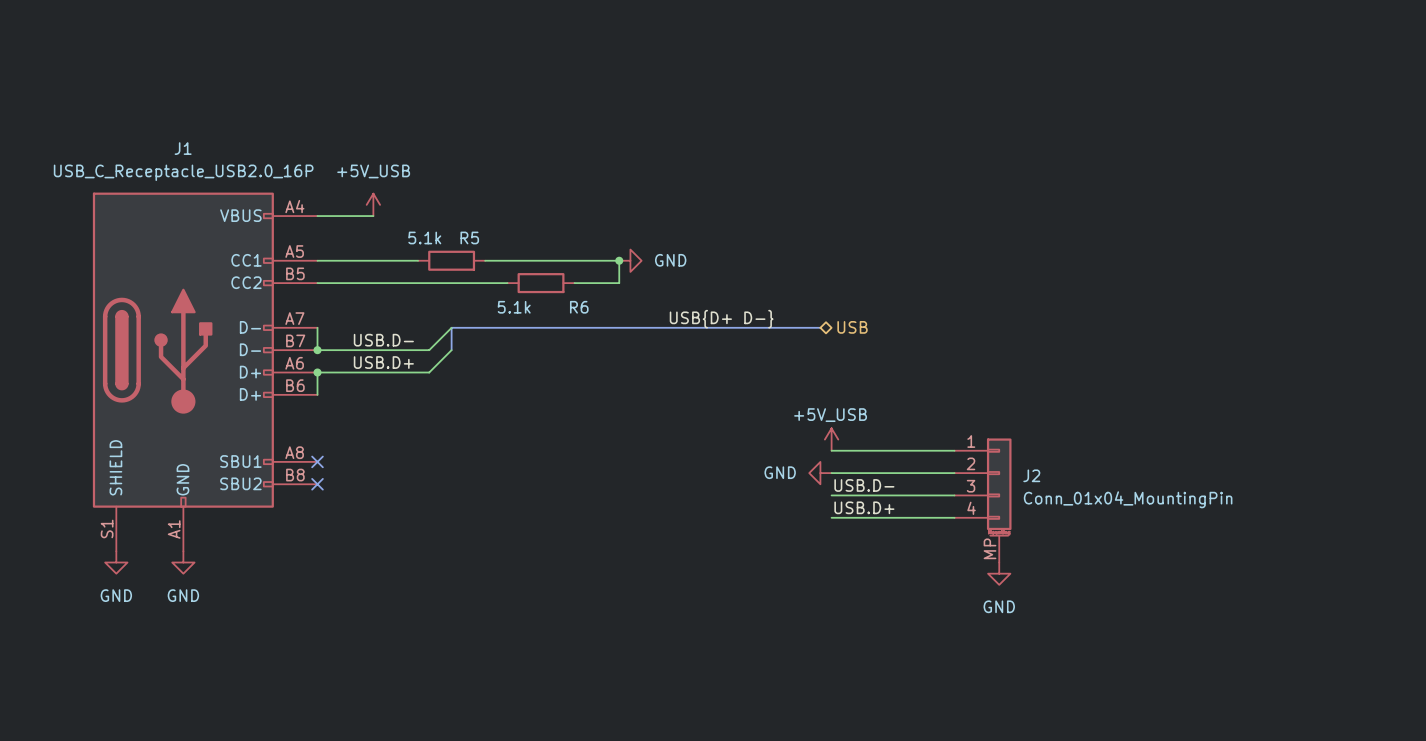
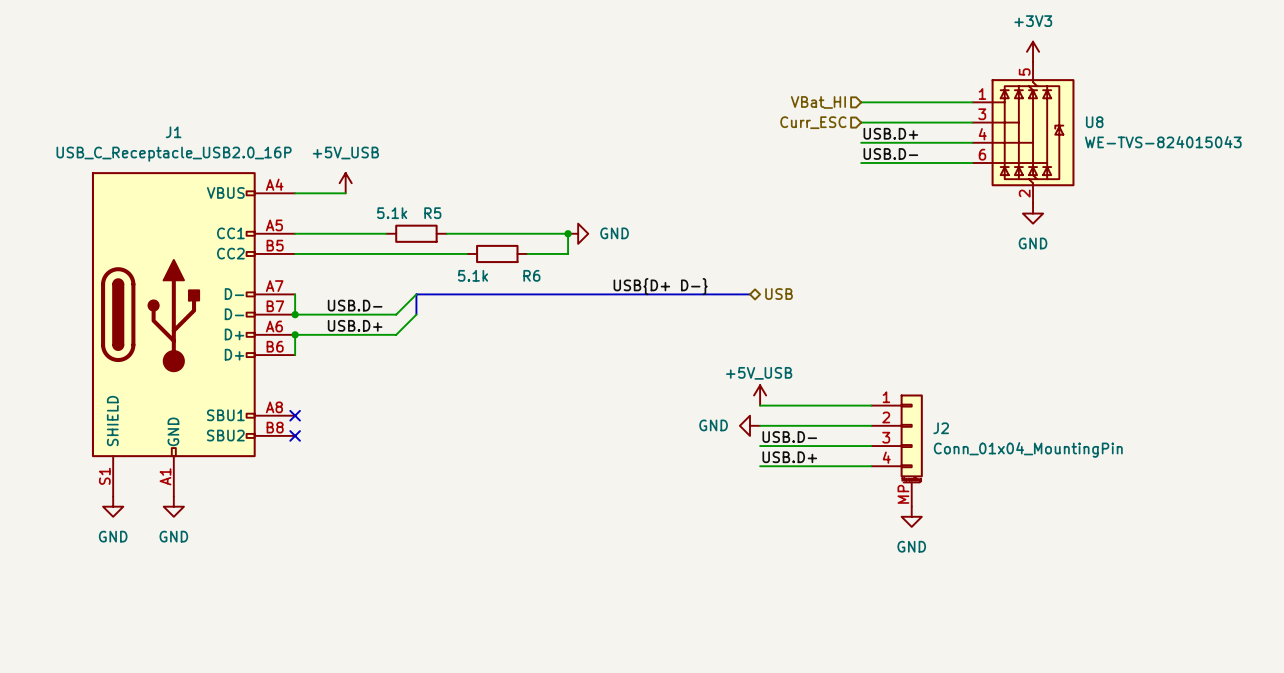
power symbol: none -> +3V3 (1033, 51)
hierarchical label: none -> VBat_HI (818, 102)
wire: none -> (861, 102) (972, 102)
hierarchical label: none -> Curr_ESC (813, 122)
wire: none -> (861, 122) (972, 122)
U8: none -> WE-TVS-824015043 (1023, 132)
label: none -> USB.D+ (890, 133)
wire: none -> (861, 142) (972, 142)
label: none -> USB.D- (890, 153)
wire: none -> (861, 163) (972, 163)
power symbol: none -> GND (1033, 213)

